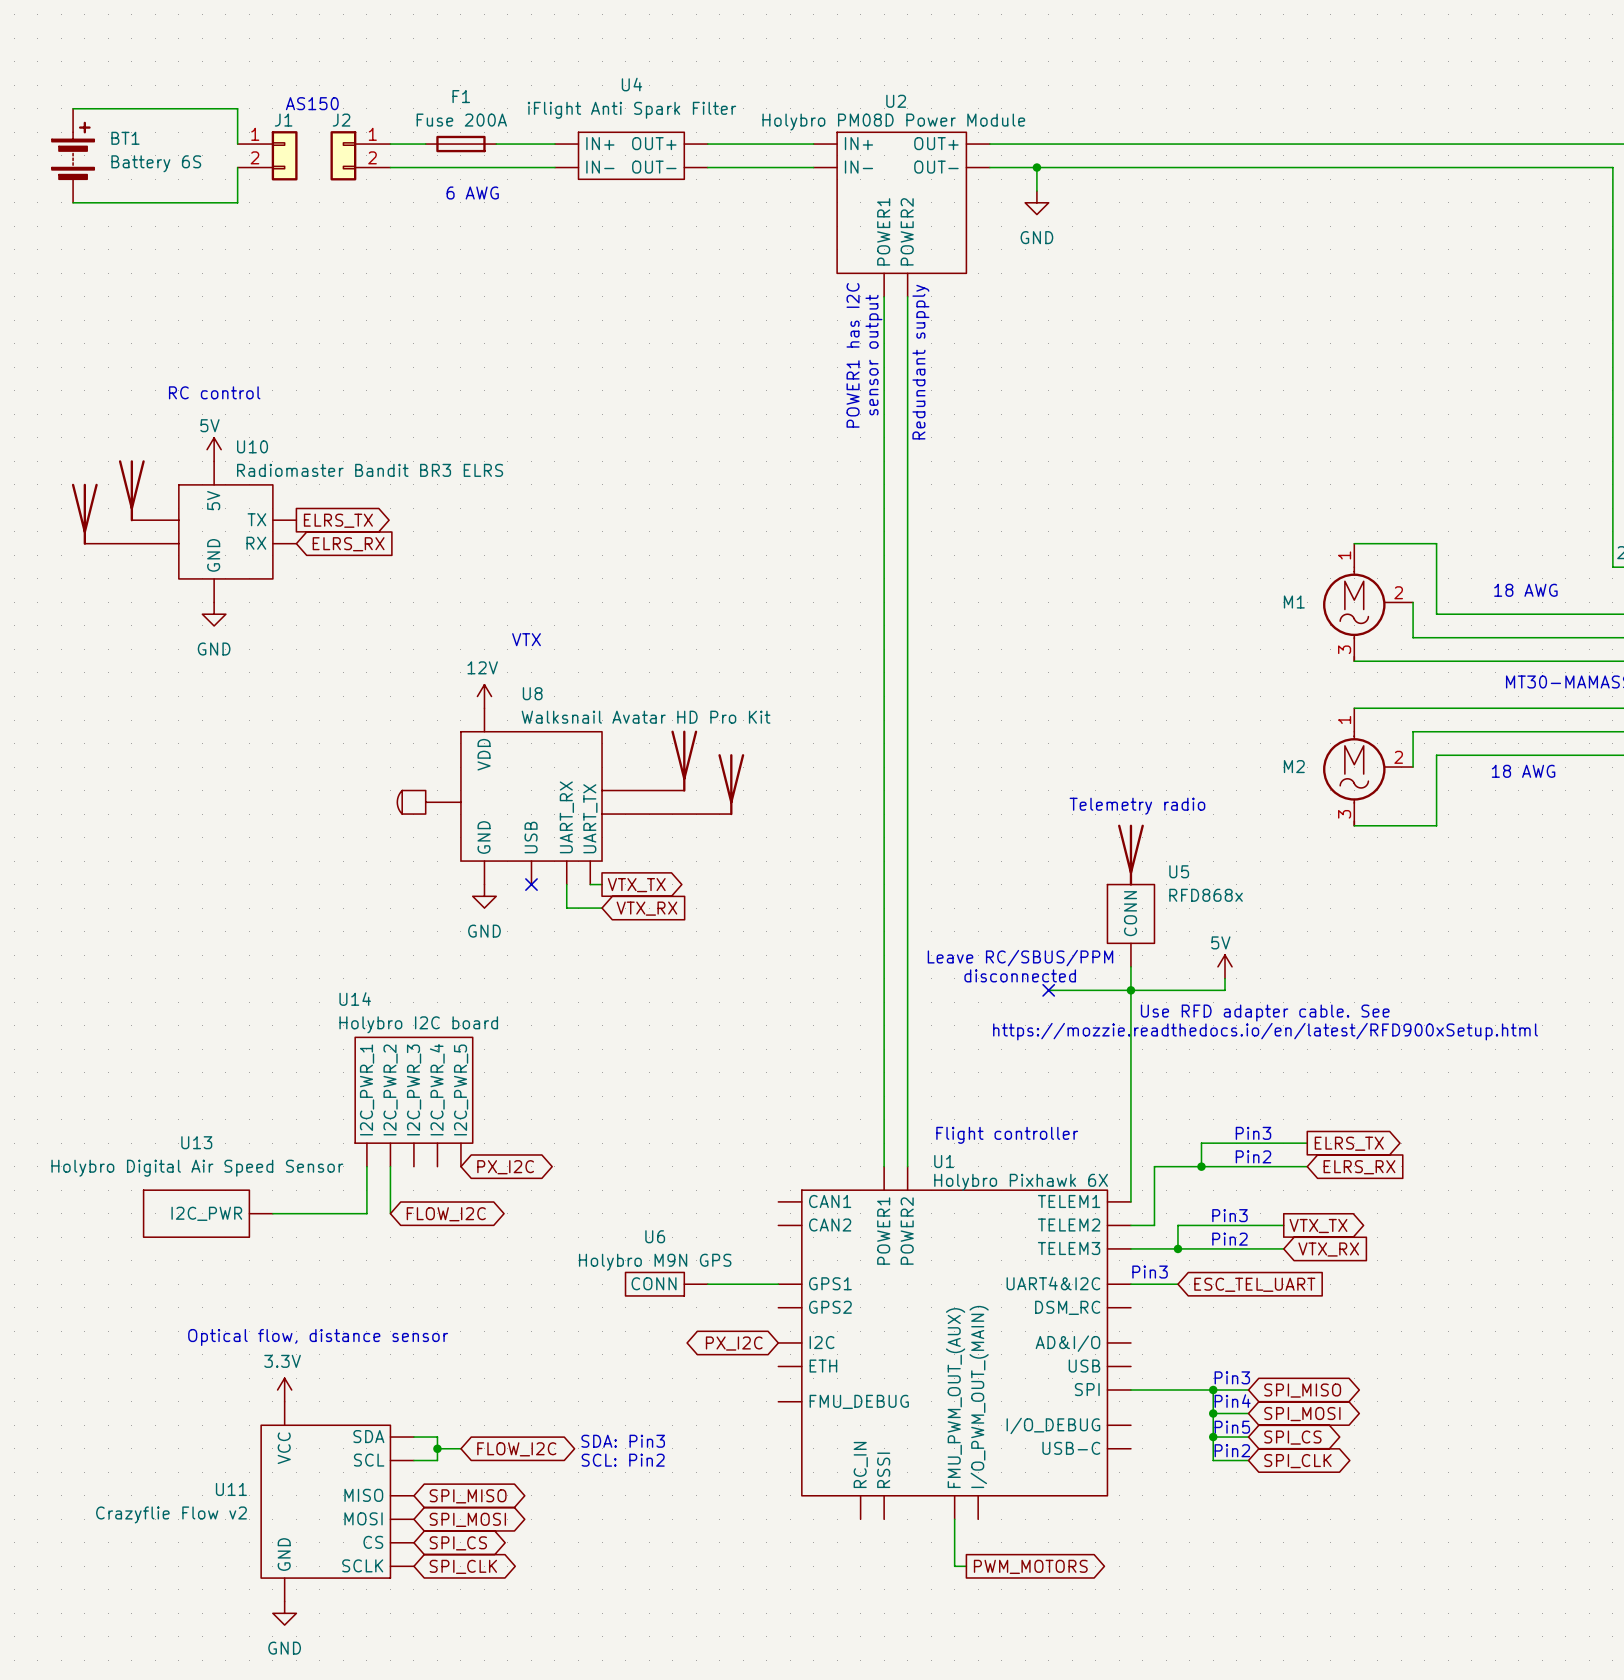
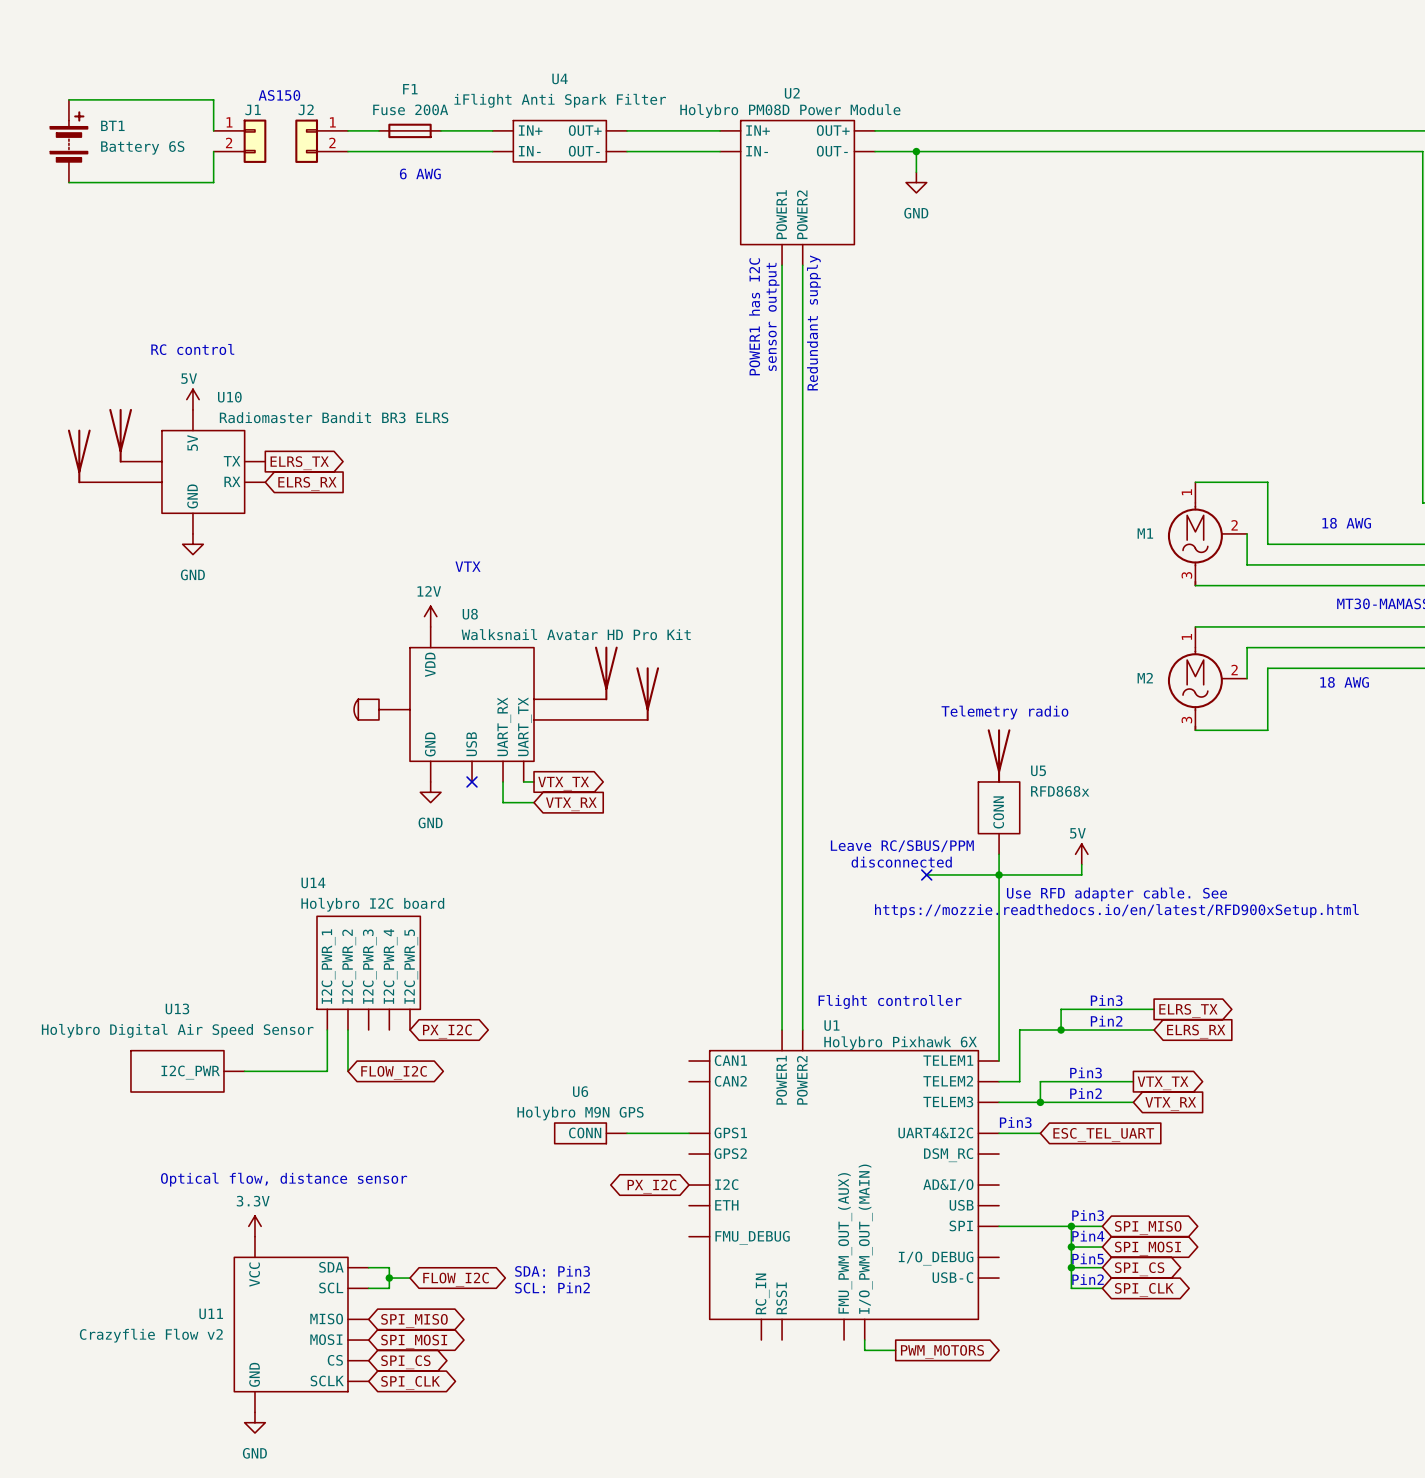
wire: (954, 1519) (954, 1566) (966, 1566) -> none
wire: none -> (864, 1340) (864, 1350) (895, 1350)
global label position: PWM_MOTORS (1030, 1566) -> PWM_MOTORS (942, 1351)

